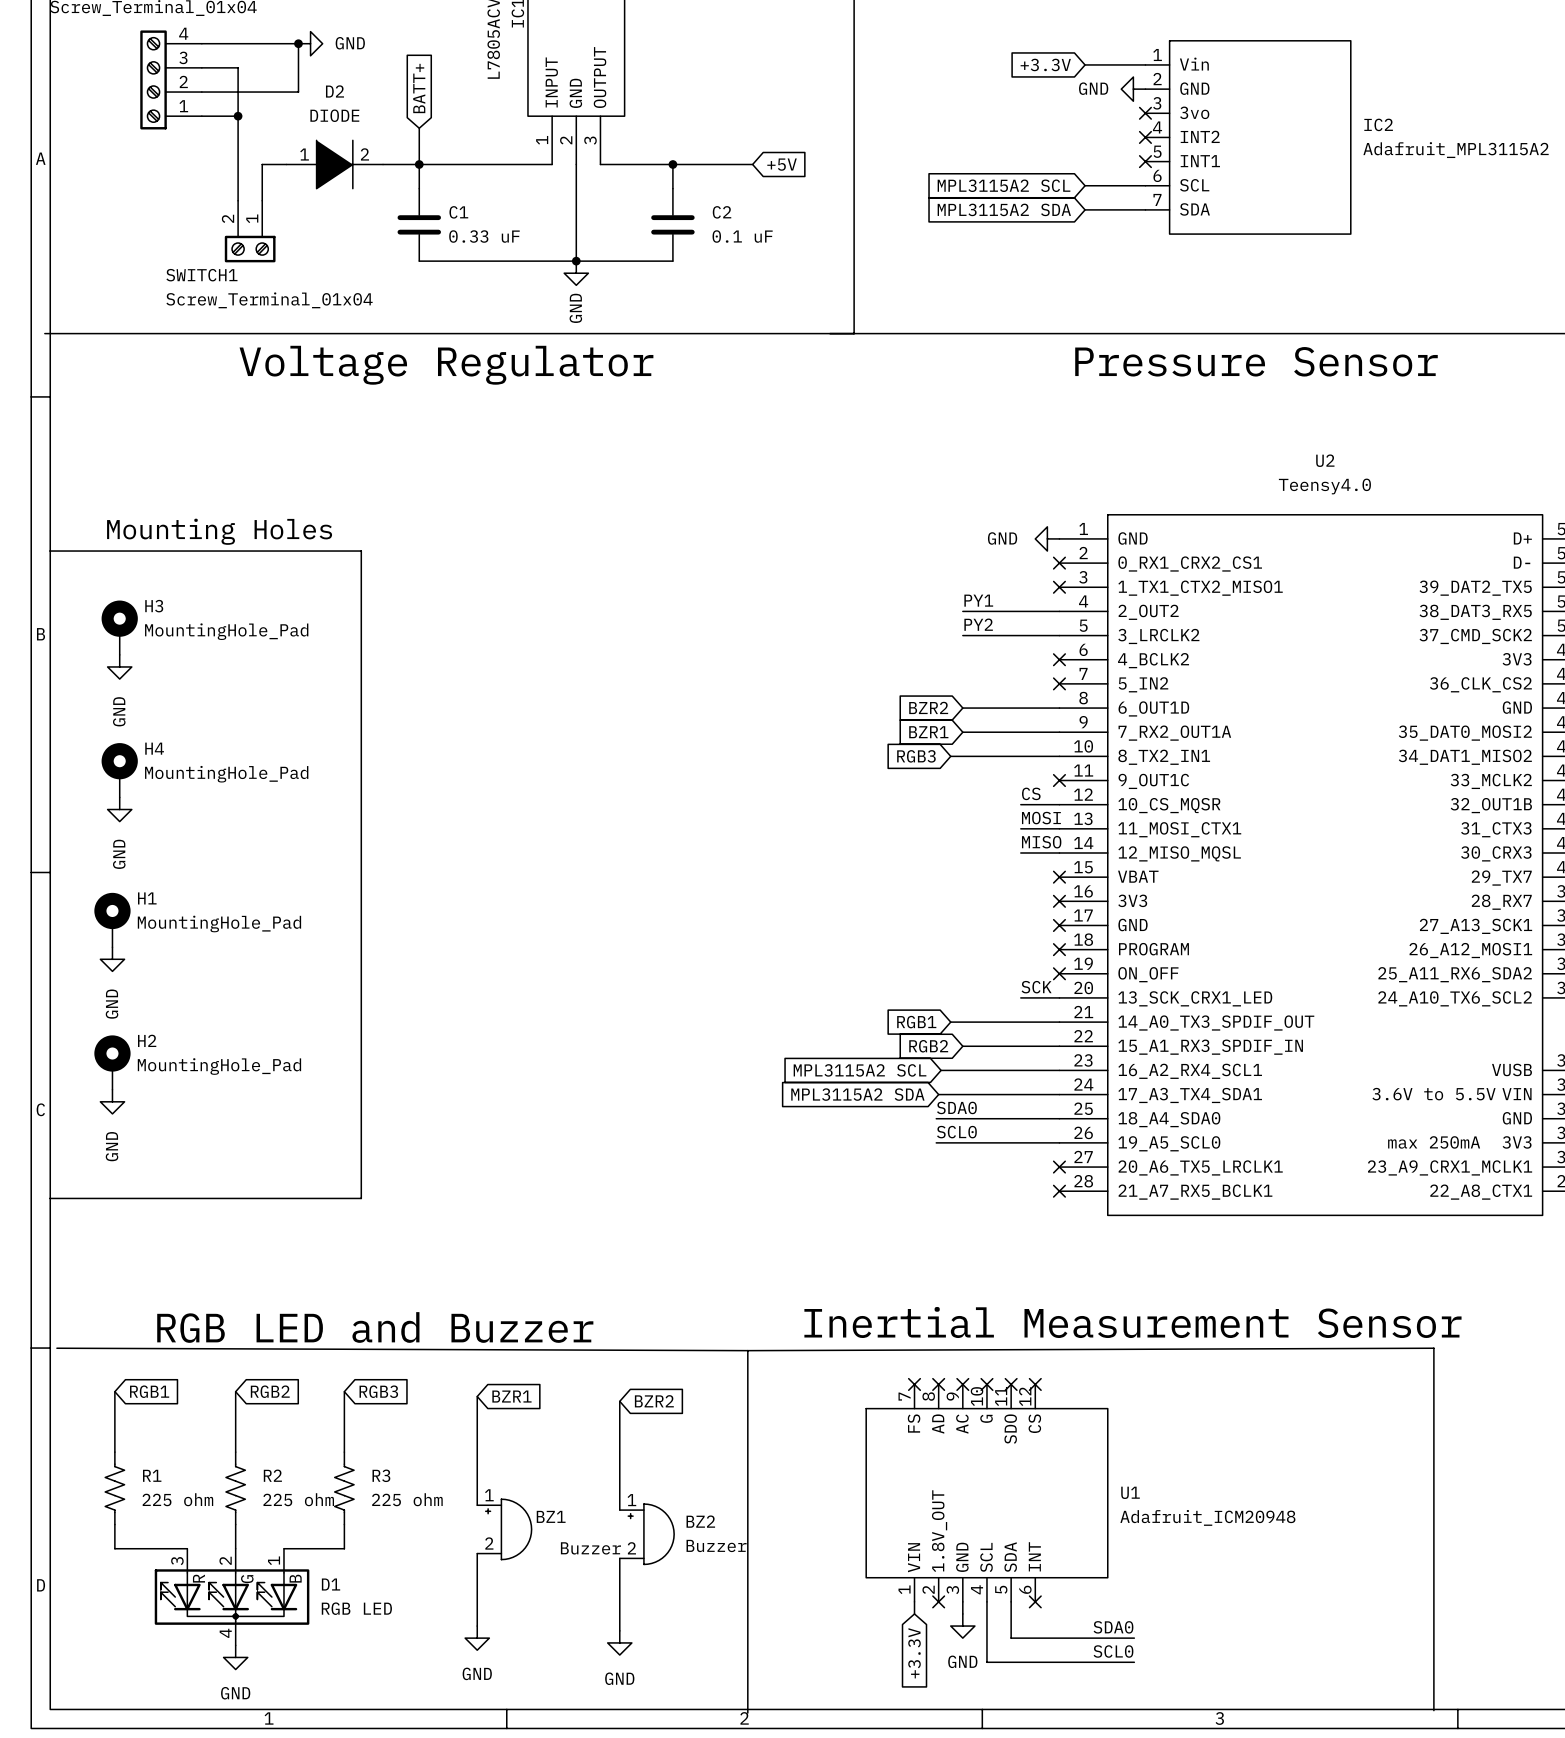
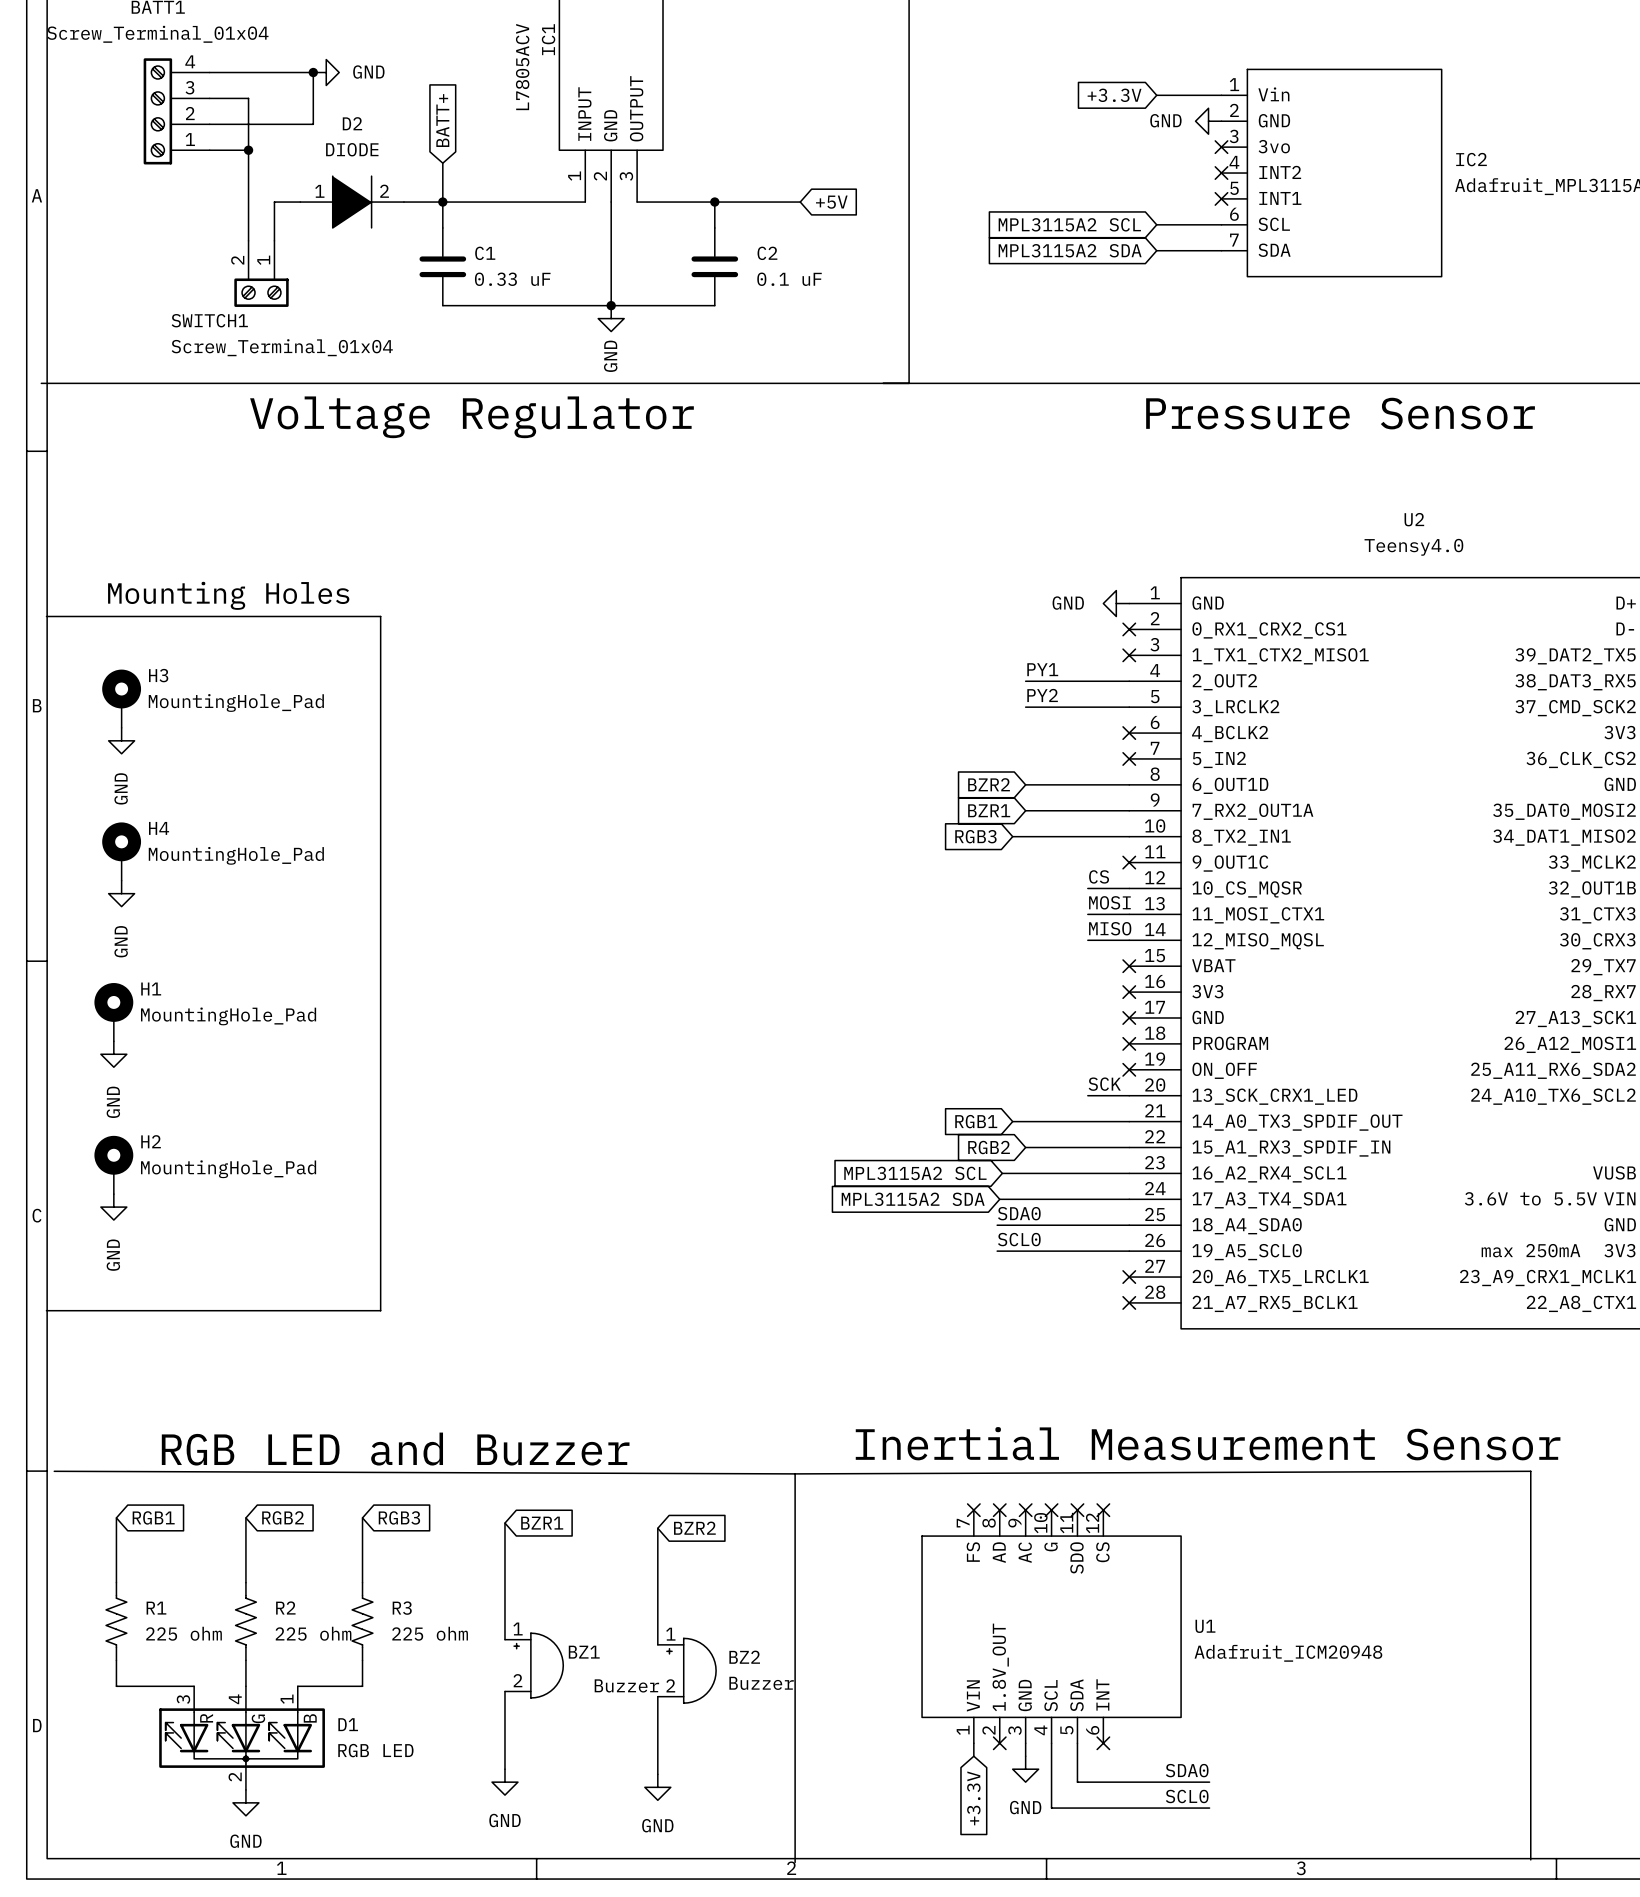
D1 pin number: 2 (225, 1560) -> 4 (235, 1699)
D1 pin number: 4 (225, 1633) -> 2 (235, 1776)

